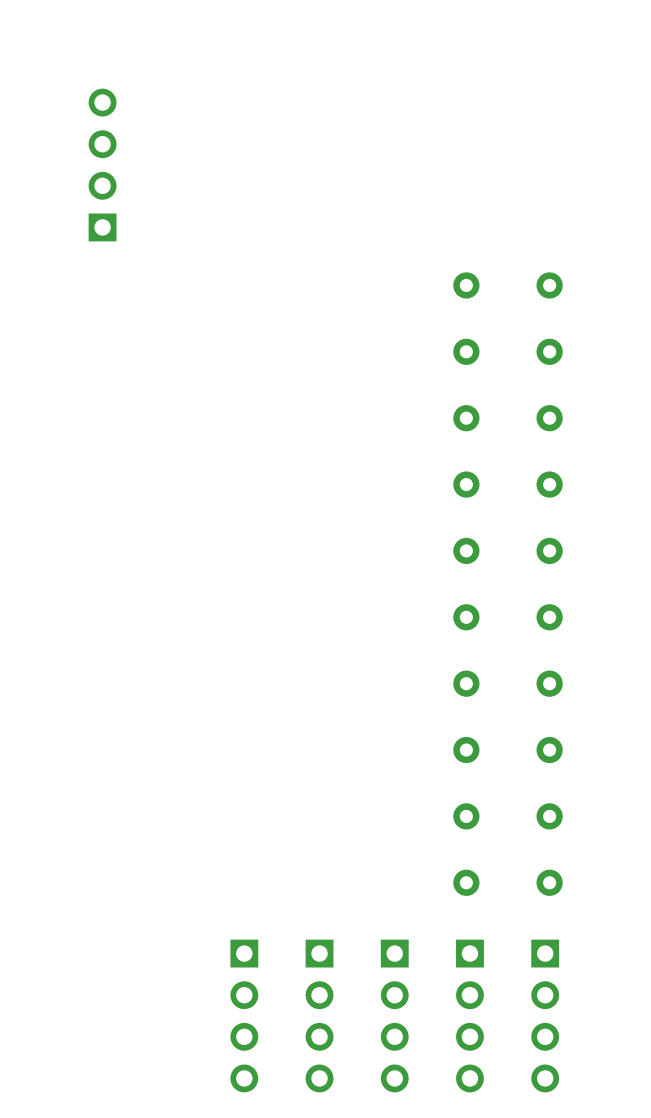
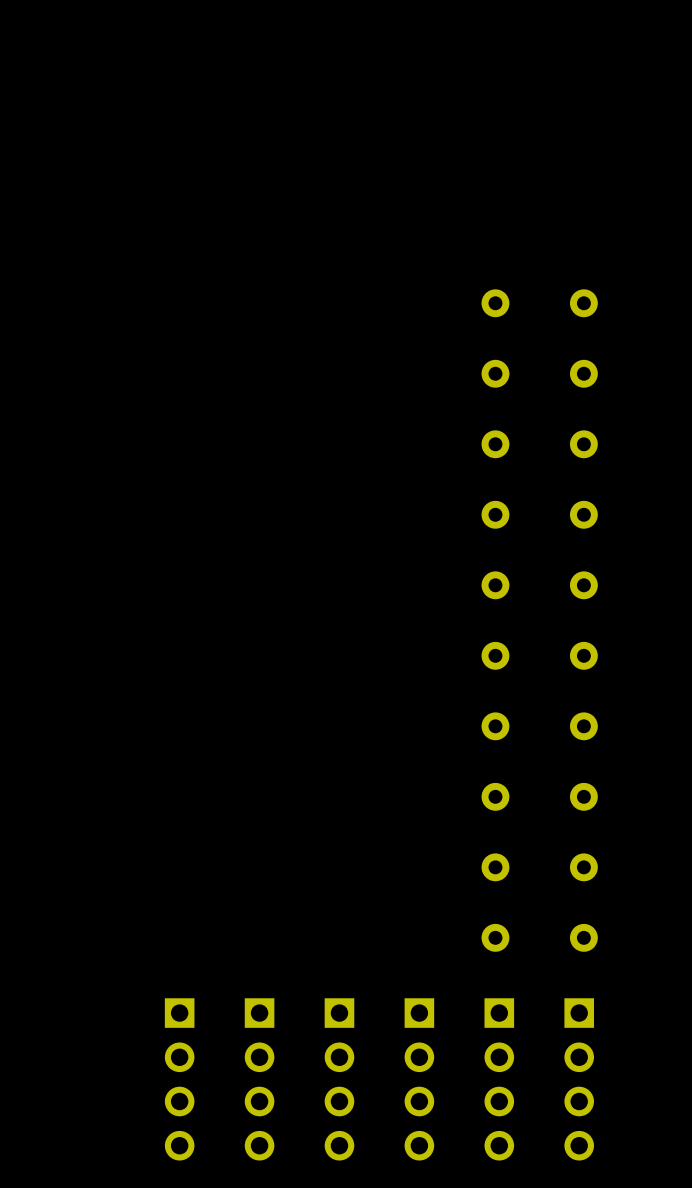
part: (102, 165) -> none
part: none -> (179, 1079)

